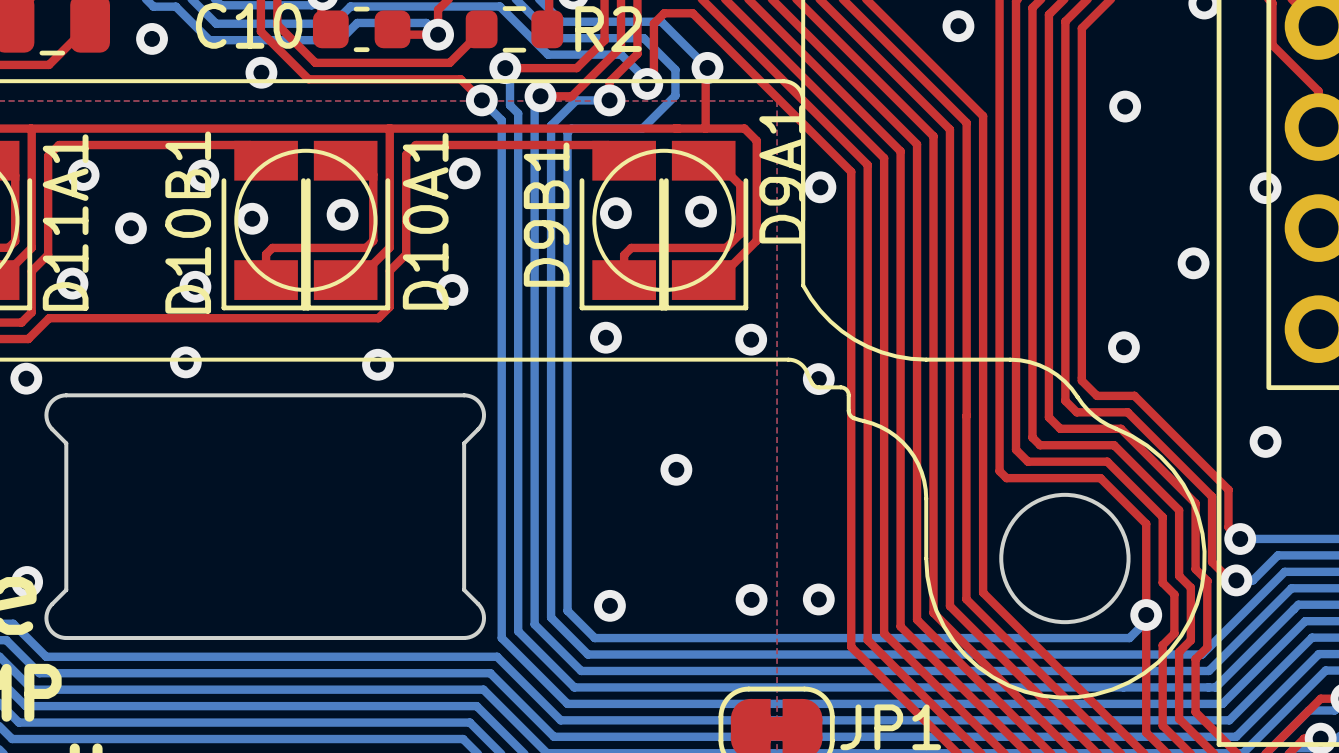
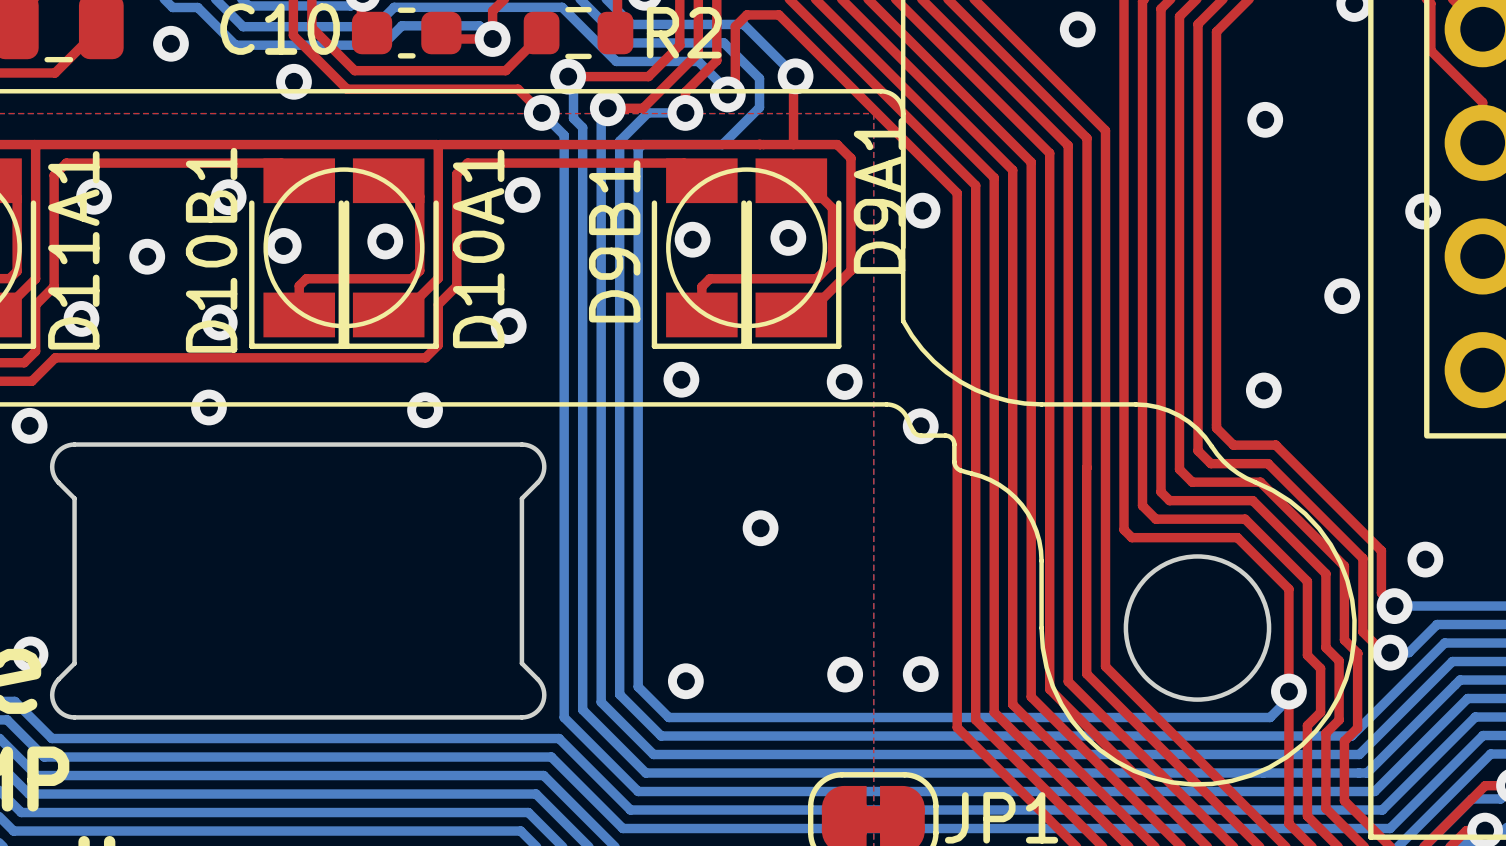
via: (1265, 441) -> none
via: none -> (1425, 559)

